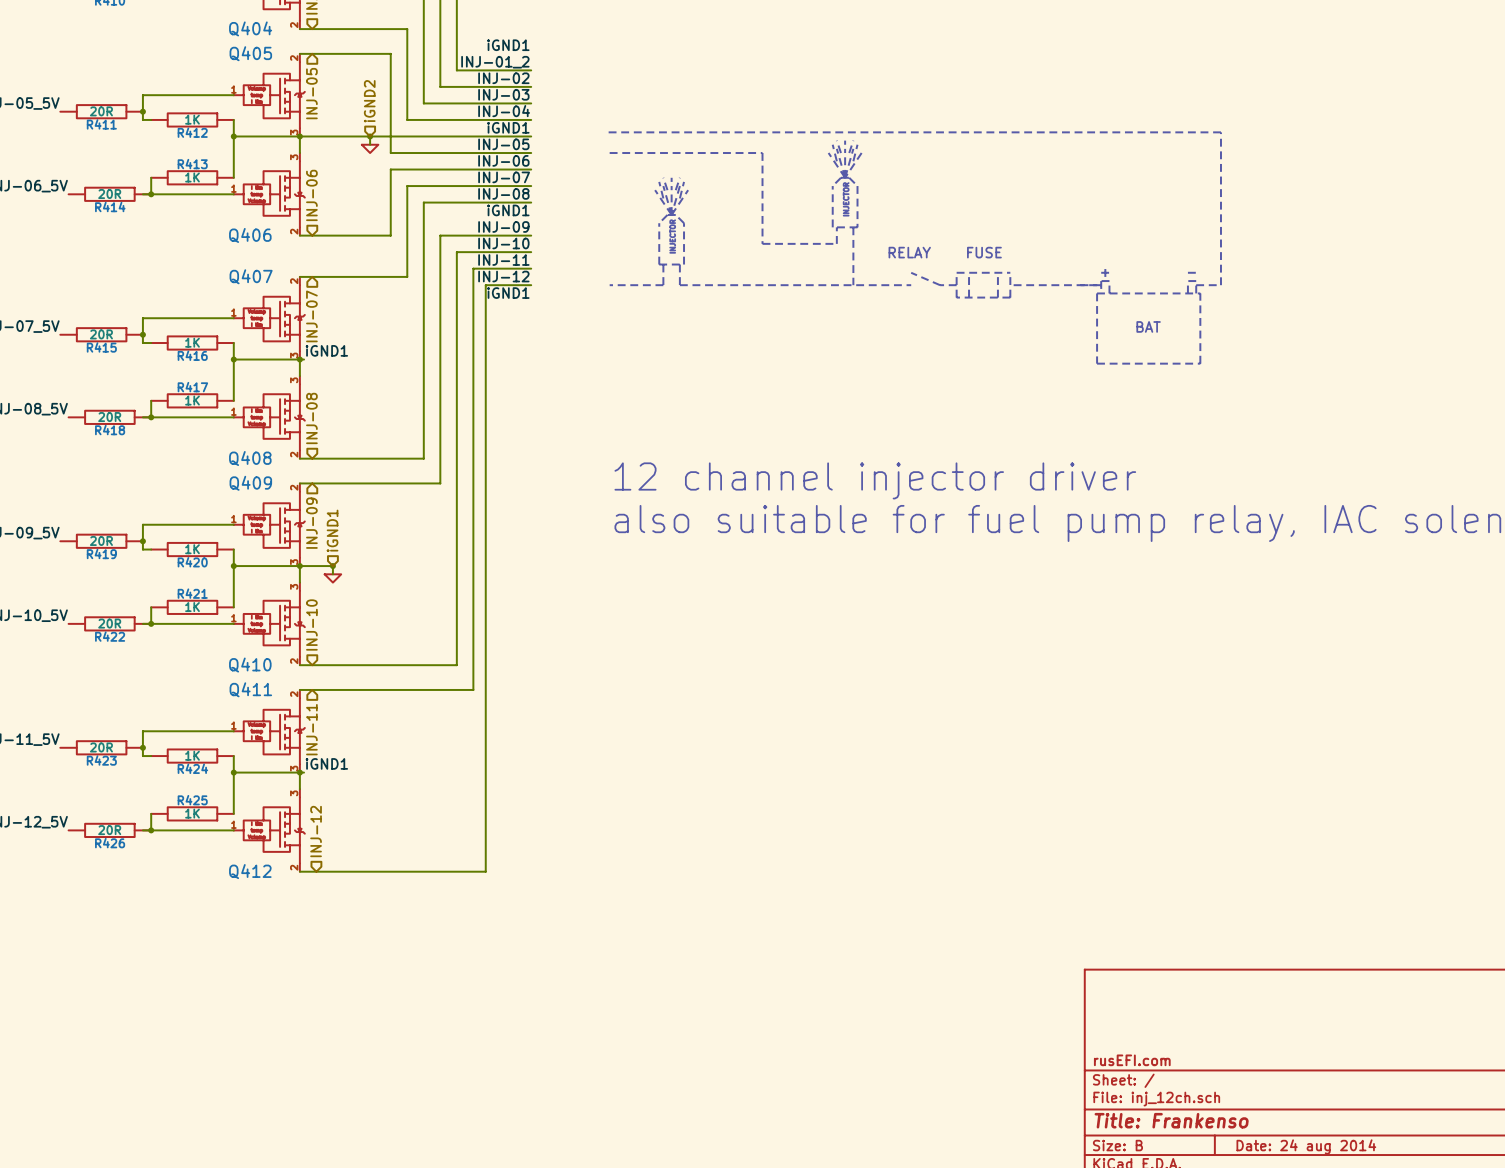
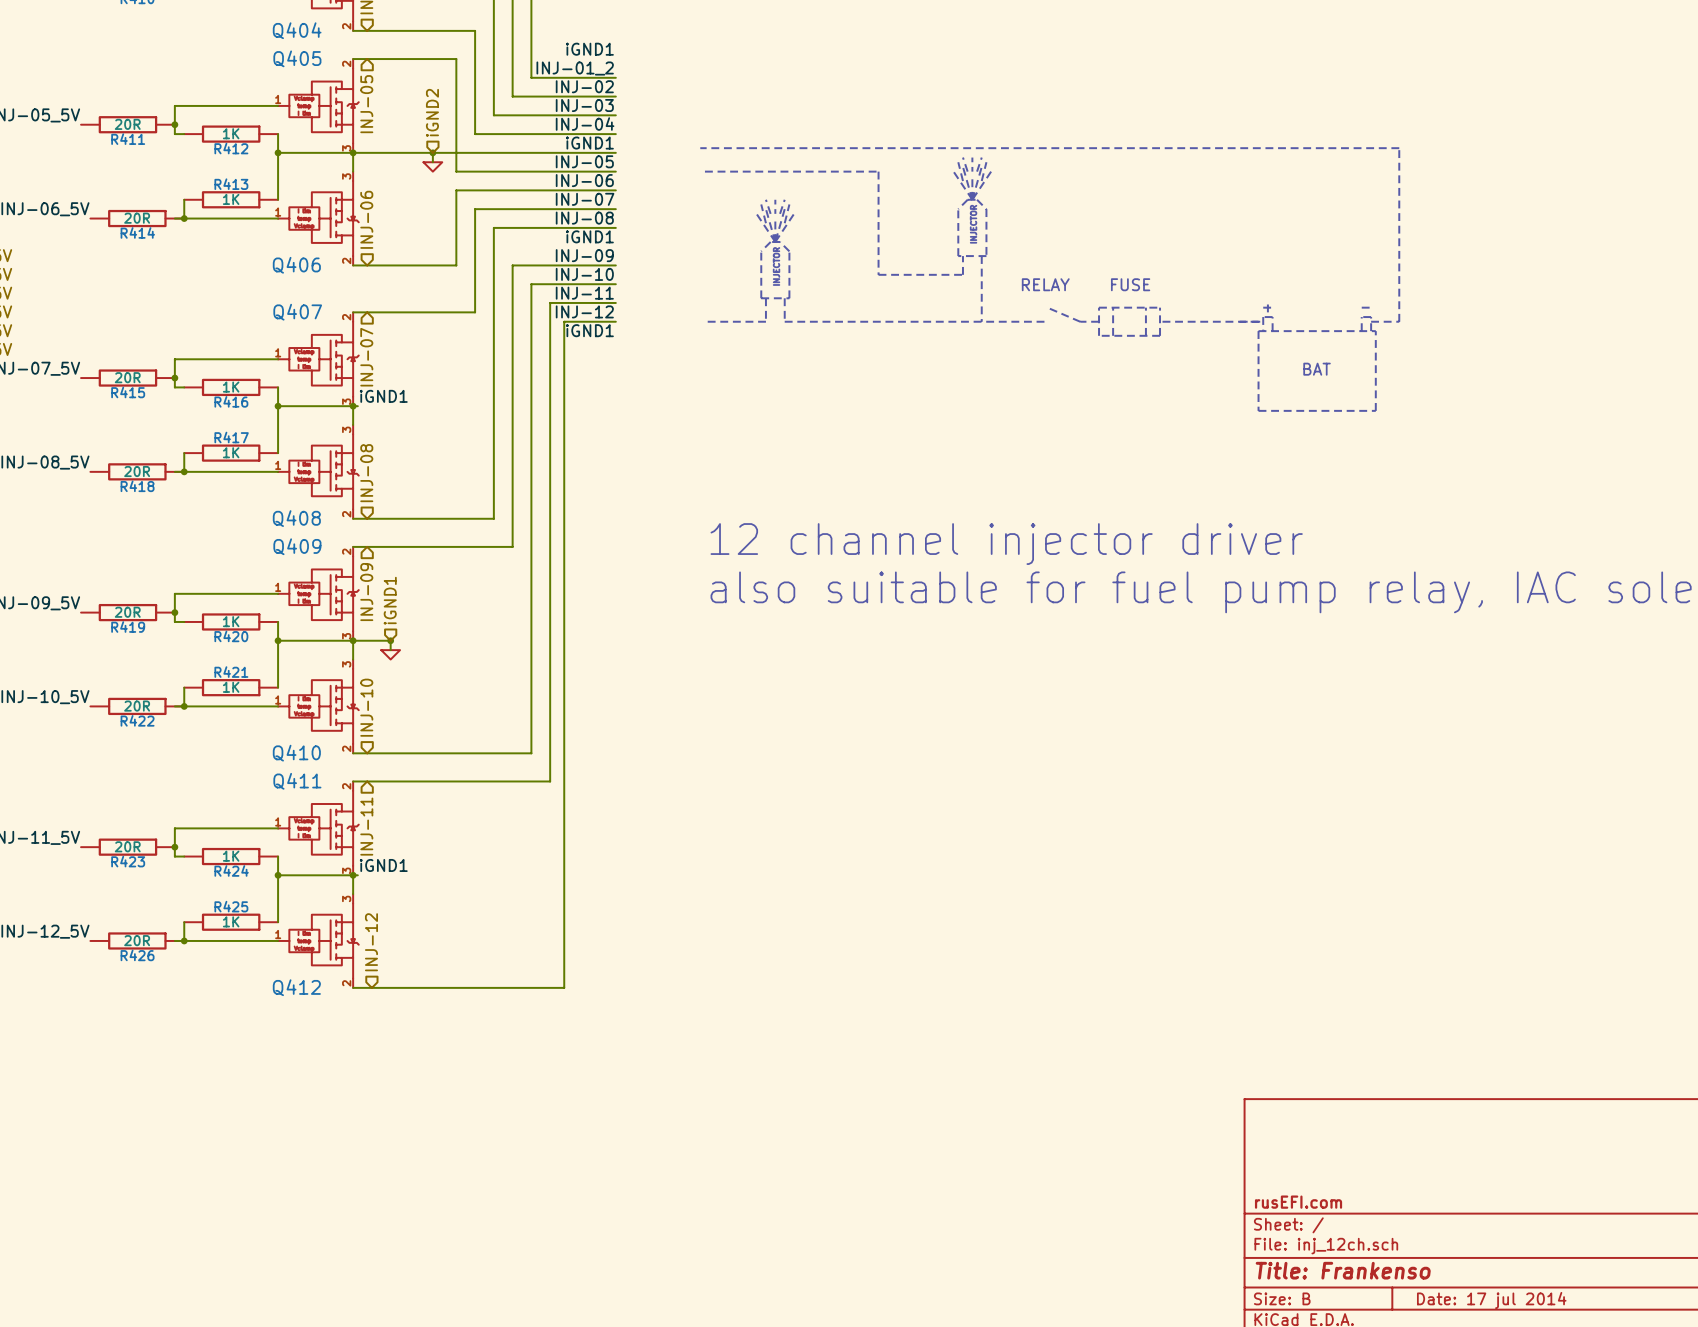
title block: Date: 24 aug 2014 (1306, 1146) -> Date: 17 jul 2014 (1491, 1300)

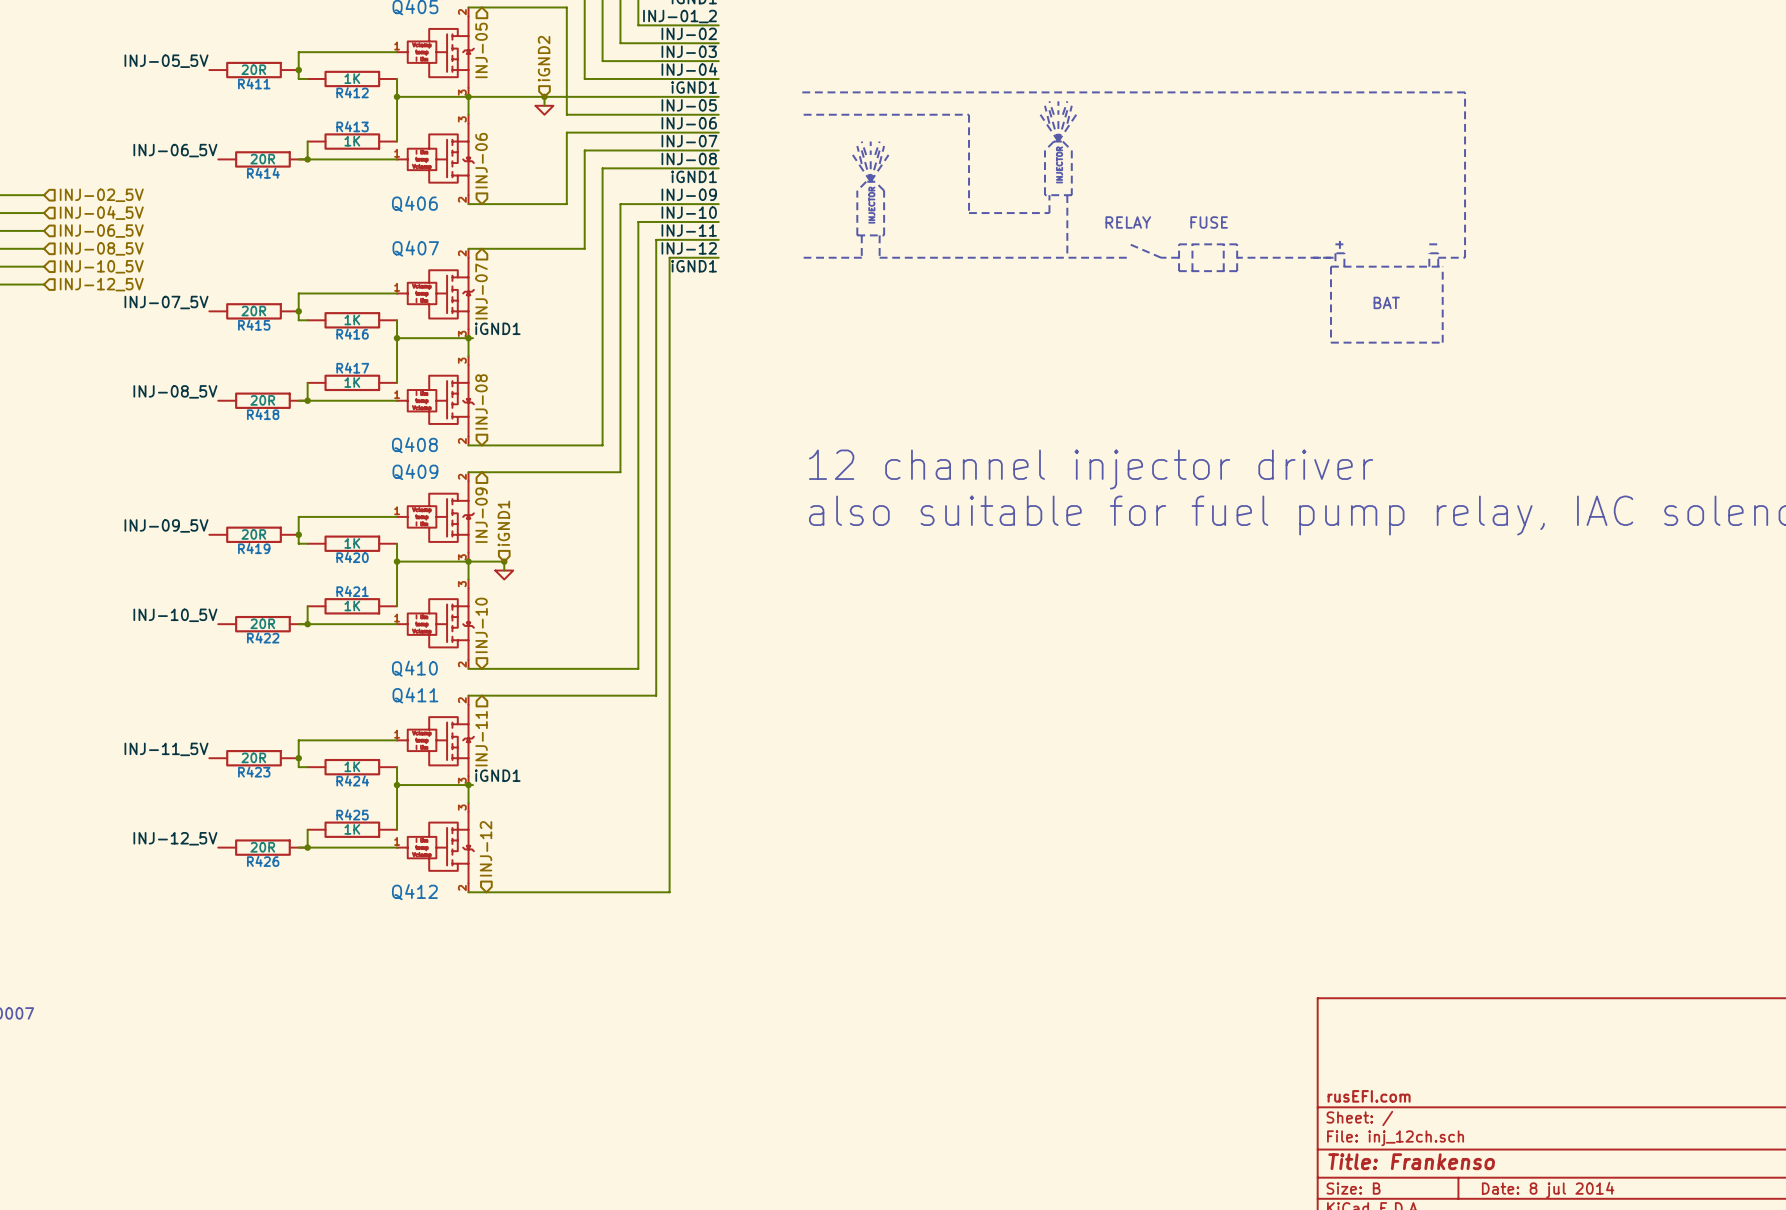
title block: Date: 17 jul 2014 (1491, 1300) -> Date: 8 jul 2014 (1548, 1190)

